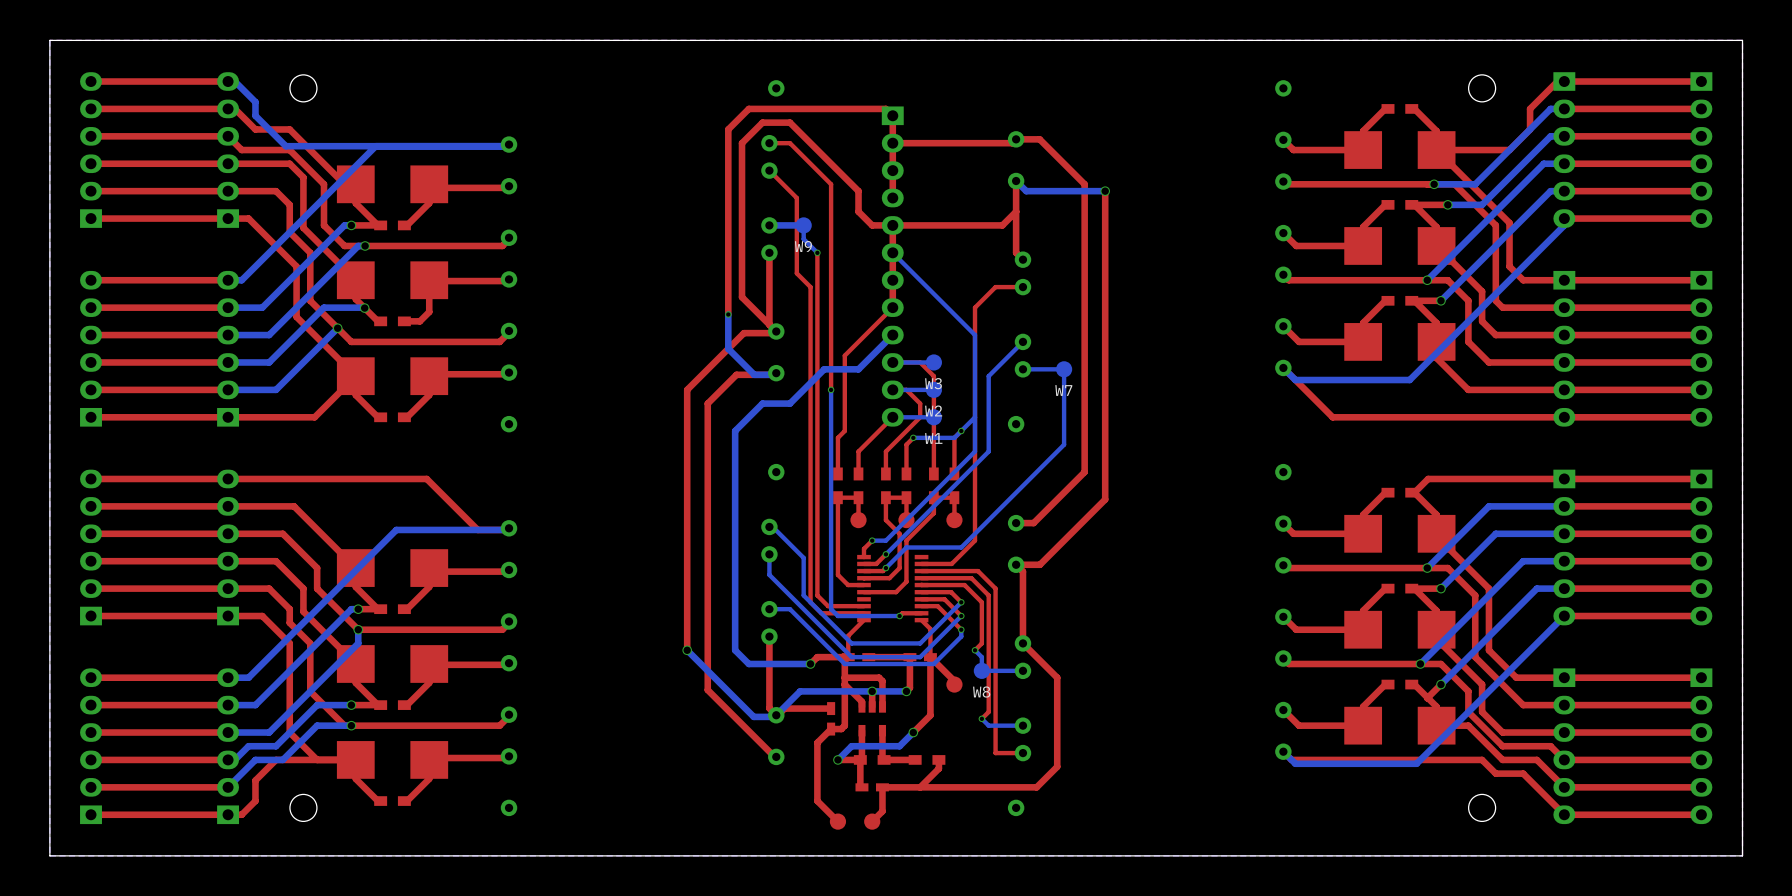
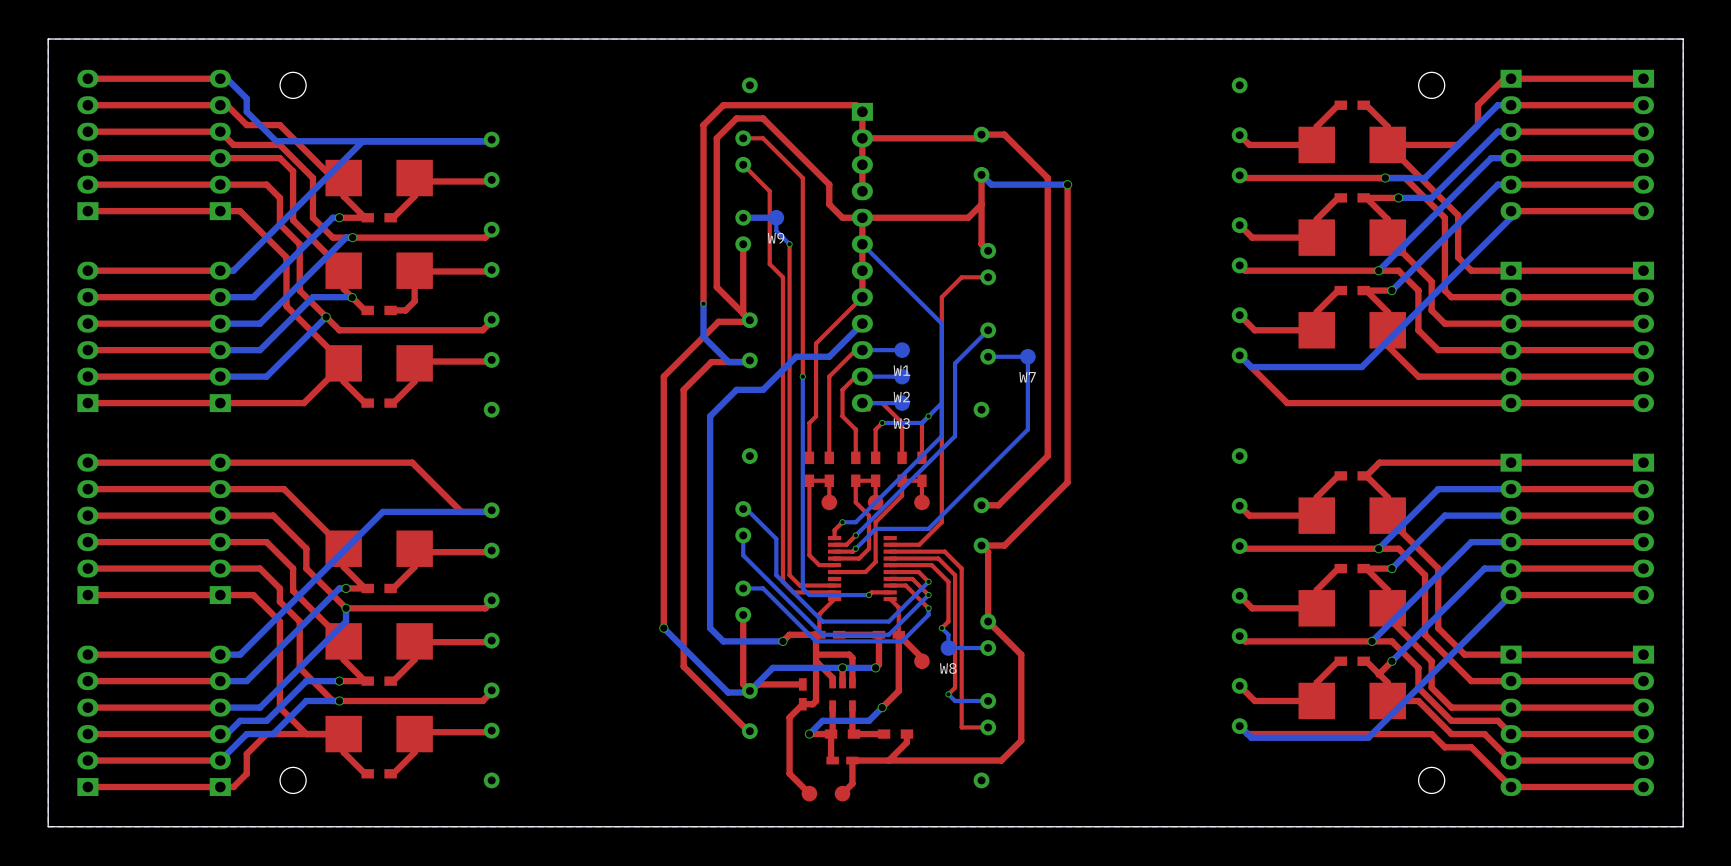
top track: (892, 362) (920, 362) (933, 376) (933, 437) -> (869, 409) (862, 403) (882, 403) (902, 422)
W3 name: W3 (933, 383) -> W1 (902, 370)
top track: (892, 389) (906, 389) (920, 403) (920, 417) (885, 451) -> (855, 376) (842, 389) (842, 416) (855, 429) (855, 436)
top track: (892, 417) (858, 451) -> (855, 350) (829, 376) (829, 436)
W1 name: W1 (933, 438) -> W3 (901, 423)

